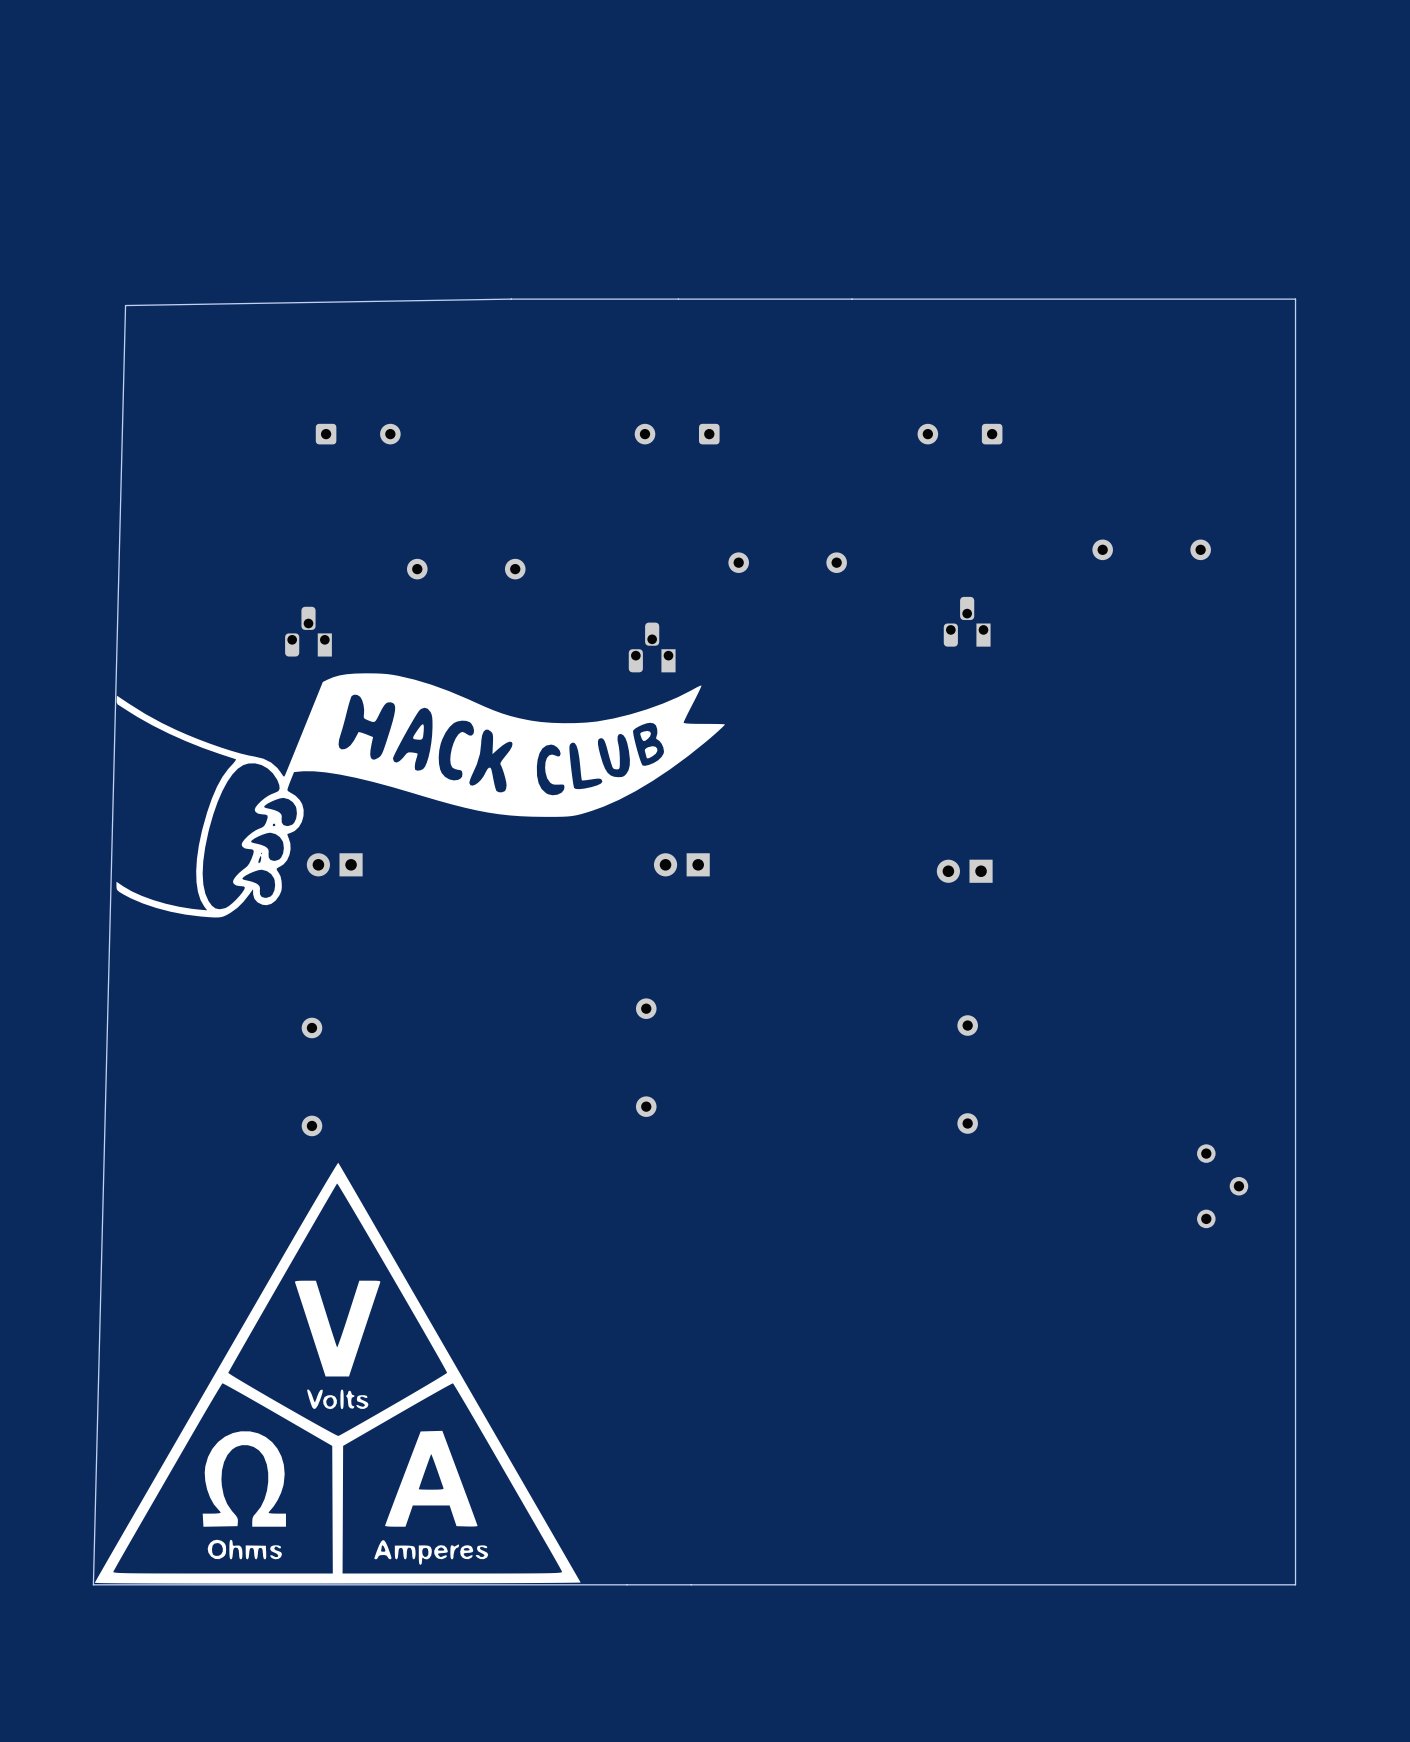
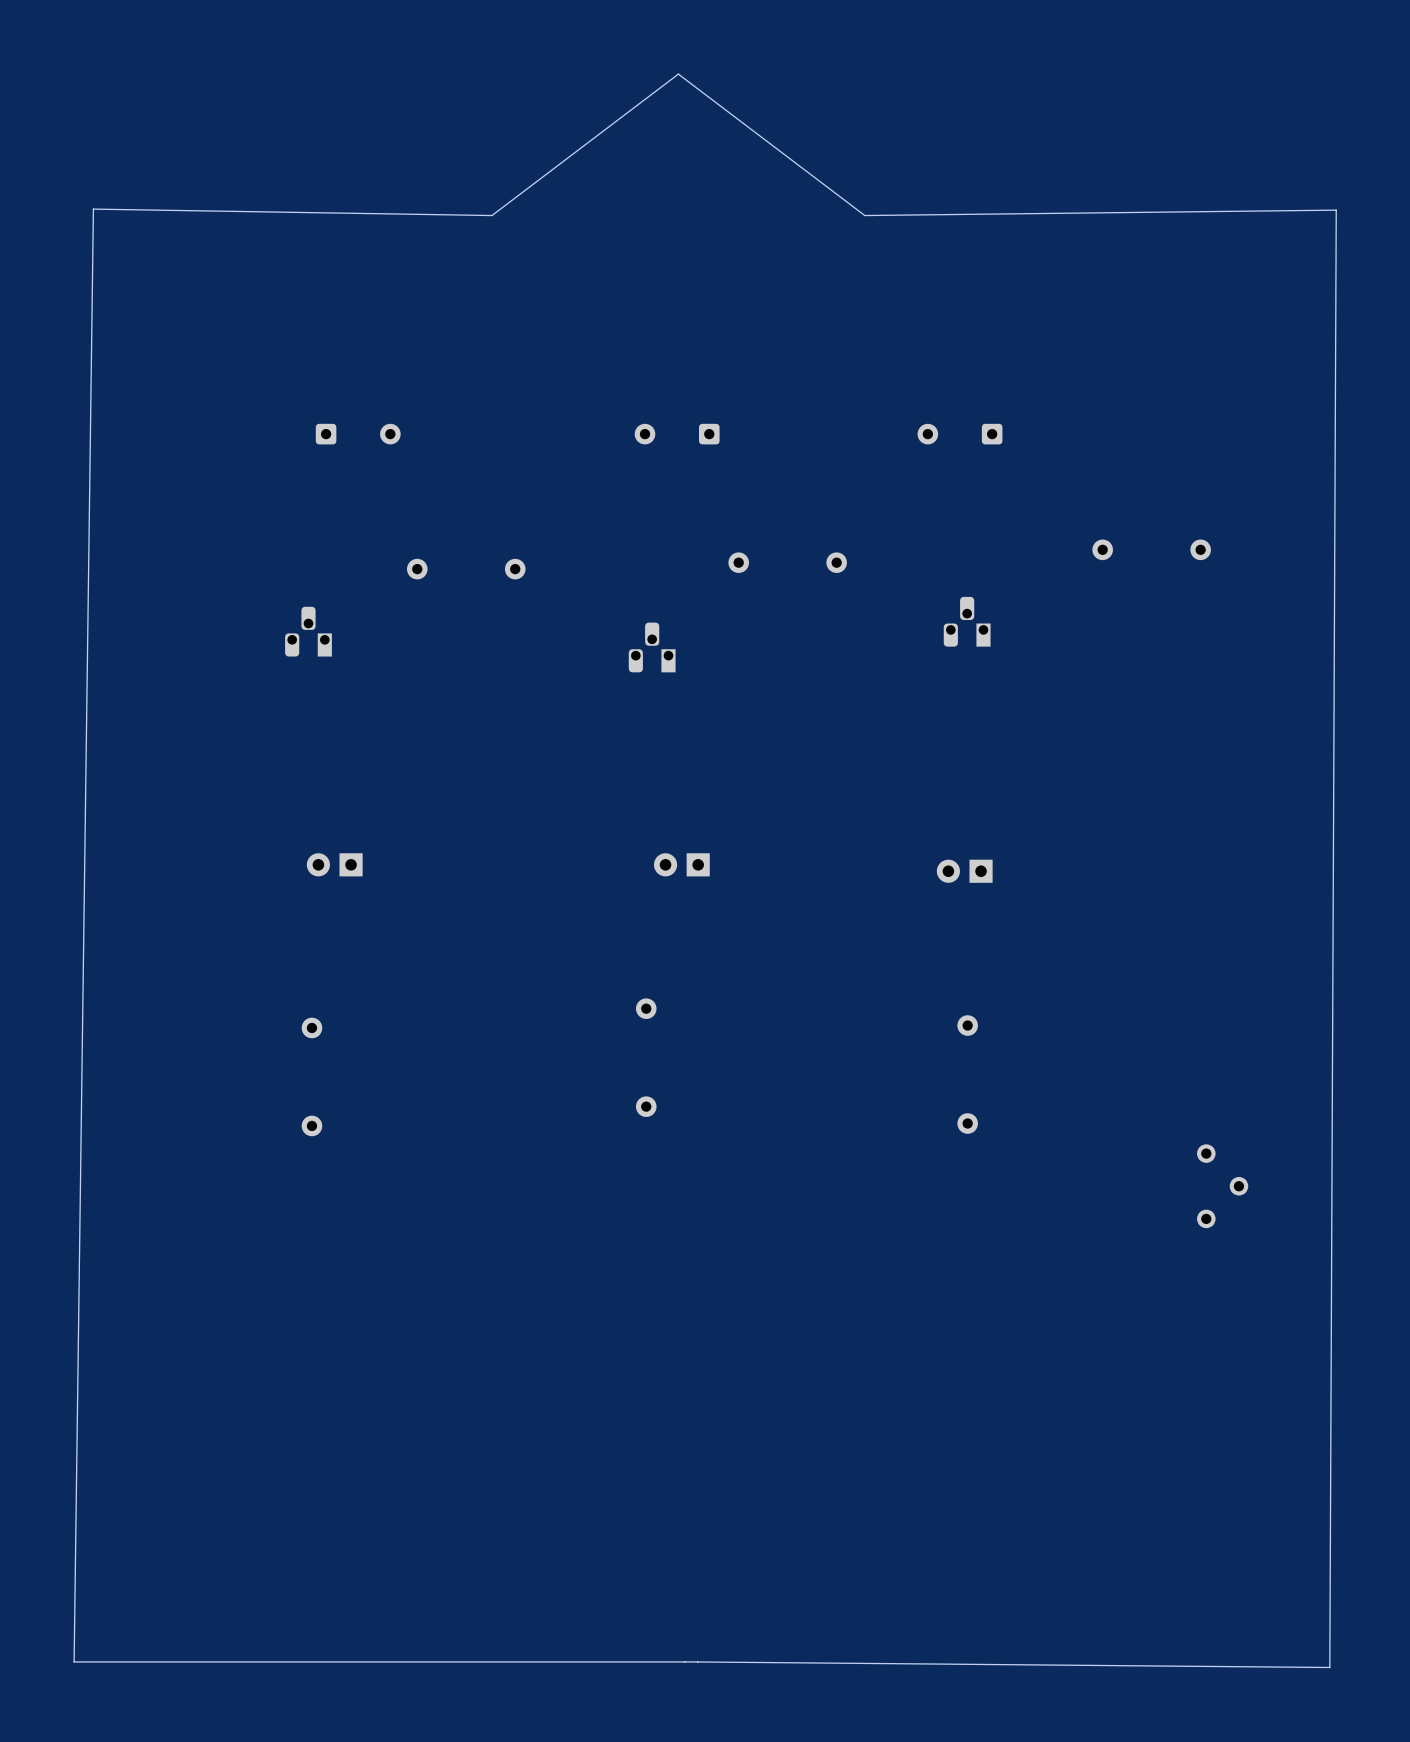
board edge: (1295, 299) (511, 299) (125, 305) (93, 1584) (1295, 1584) (1295, 299) -> (678, 74) (864, 215) (1336, 210) (1329, 1667) (697, 1661) (74, 1661) (93, 209) (491, 215) (678, 74)
drawing: [116, 673, 725, 918] -> none
drawing: [94, 1162, 581, 1584] -> none

